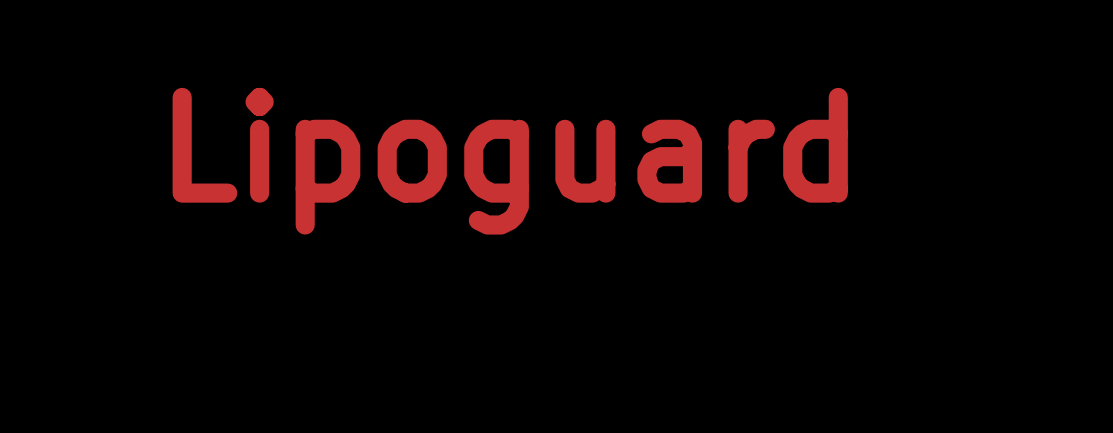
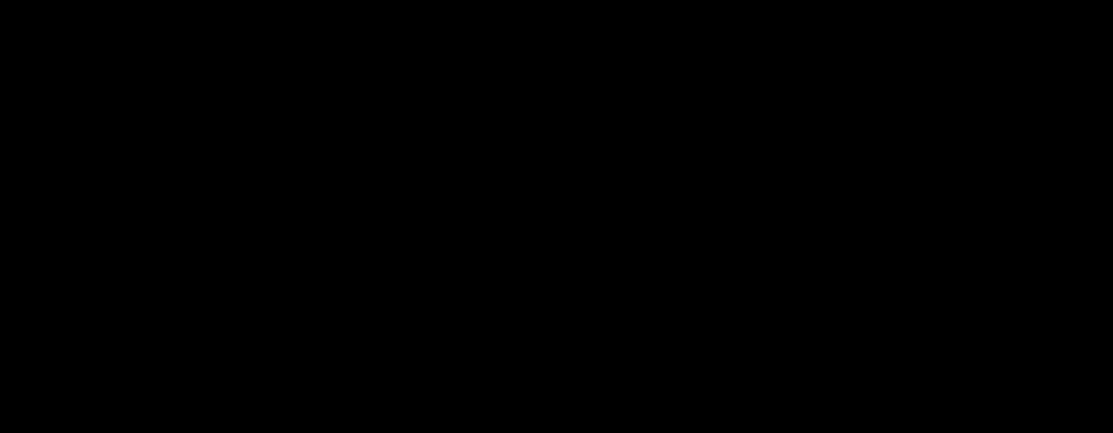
text: Lipoguard (510, 161) -> none

